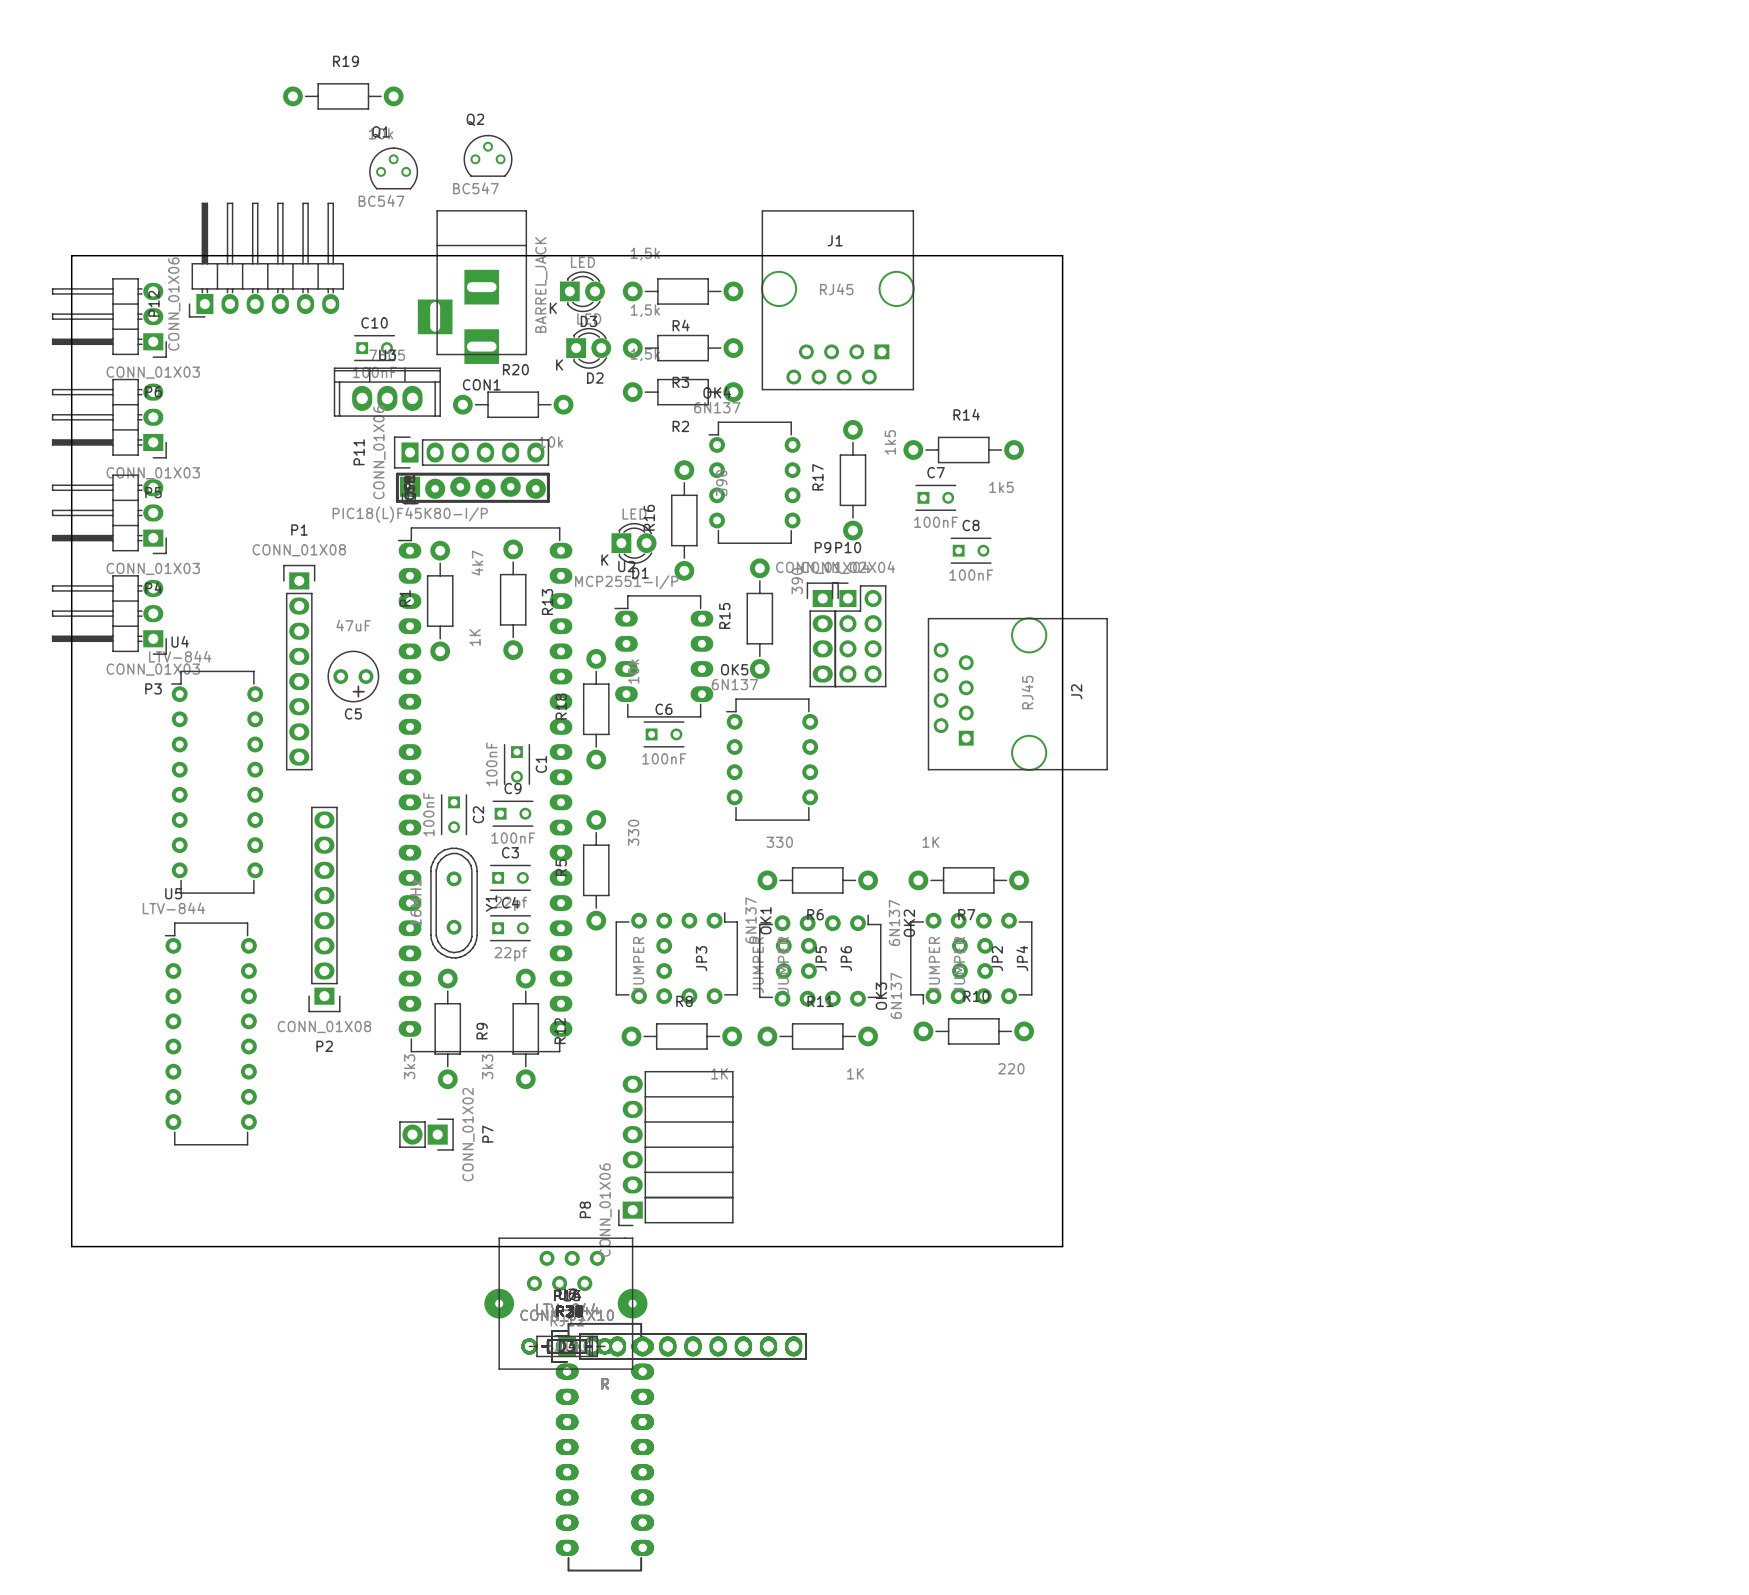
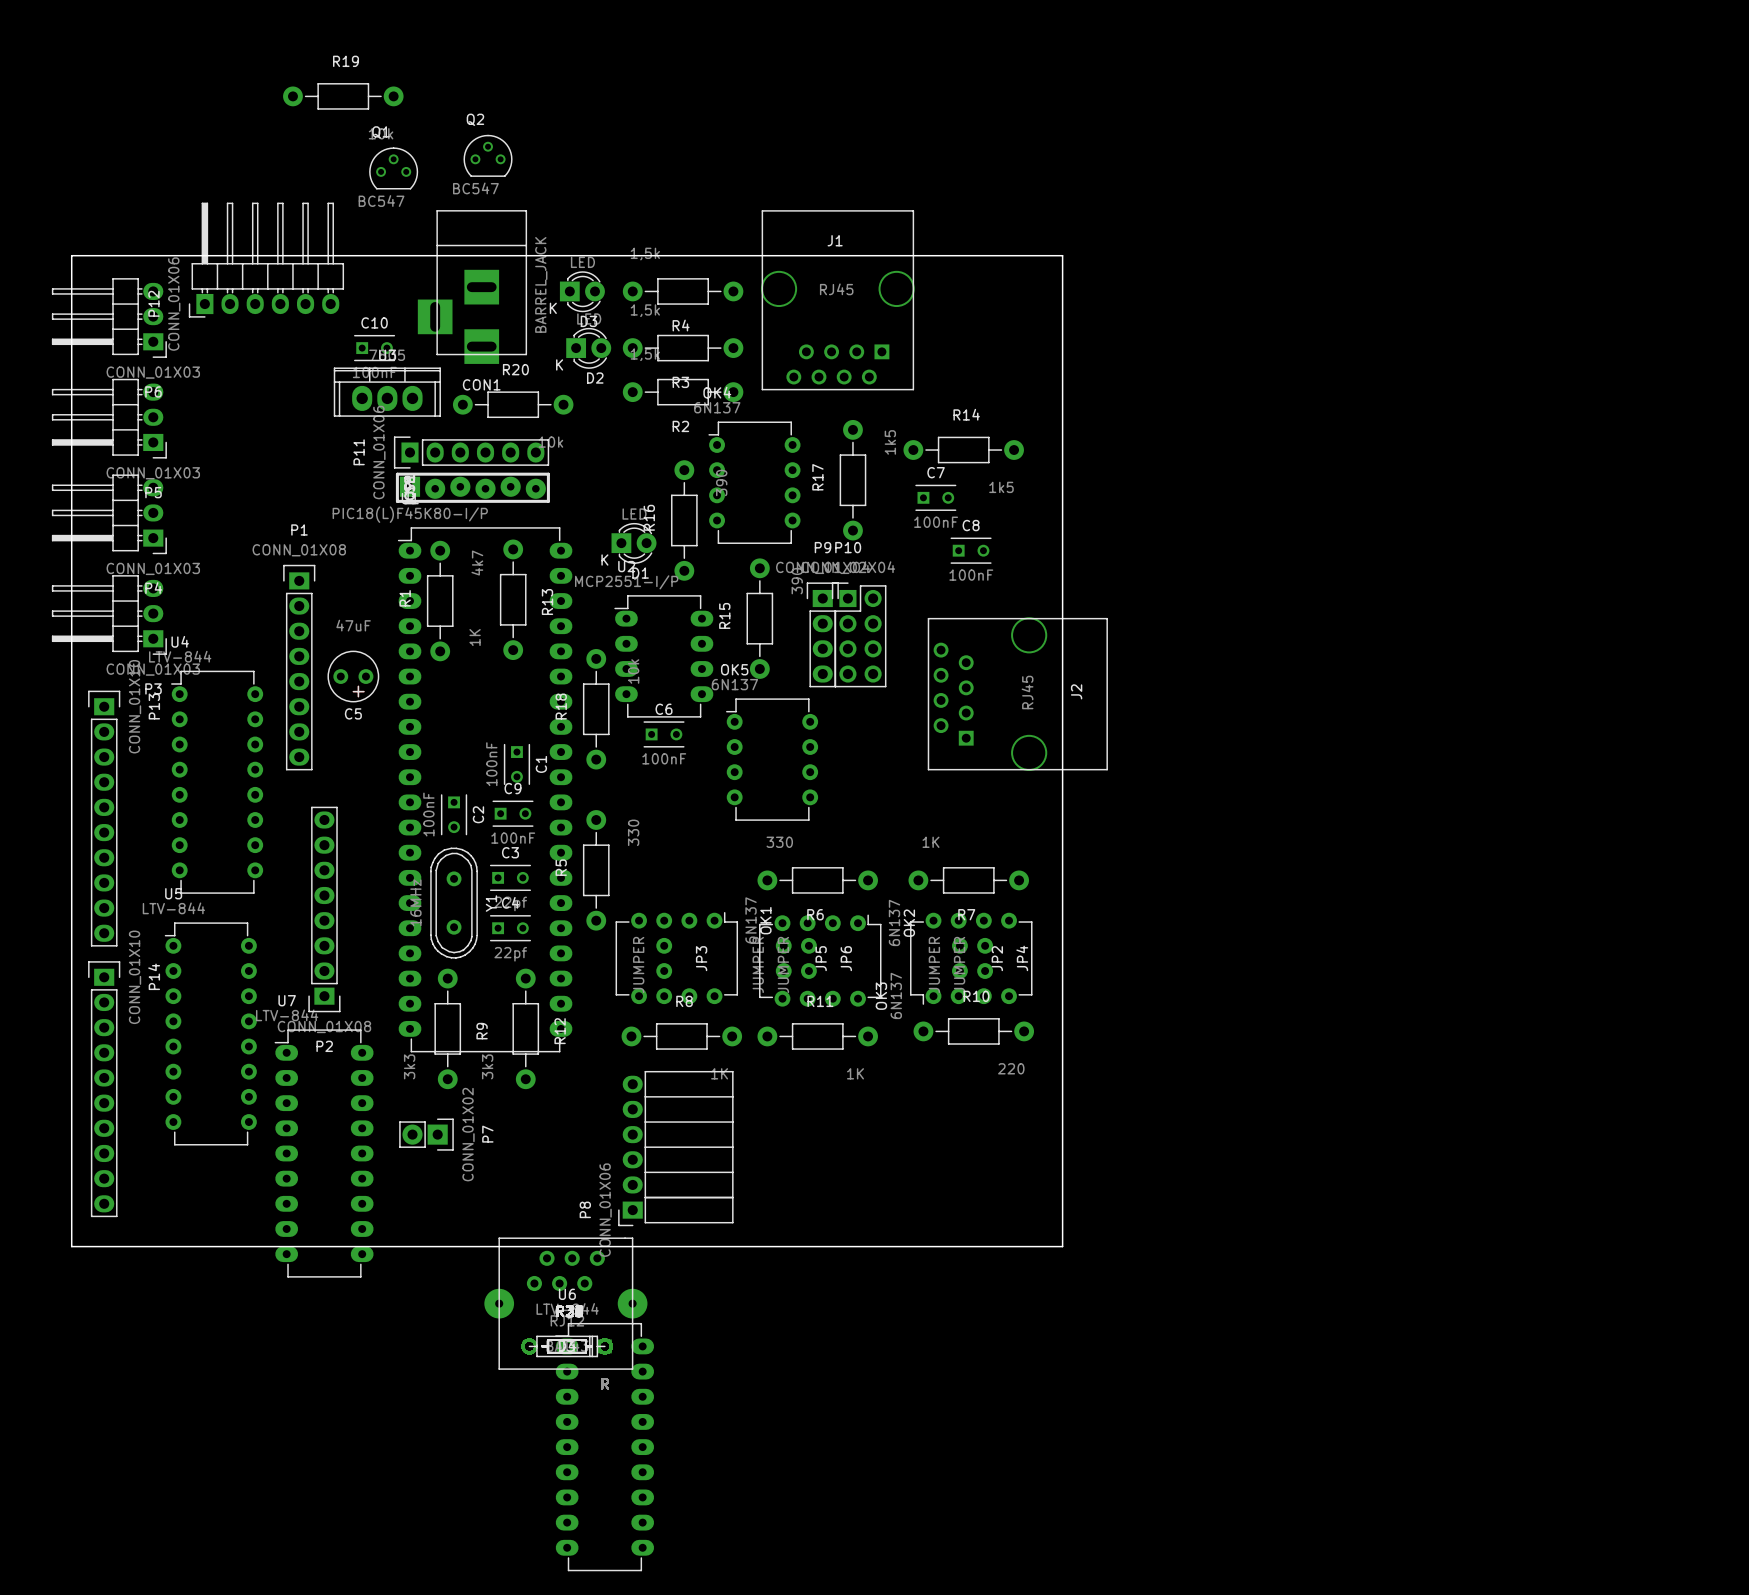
P13 rotation: 0° (679, 1346) -> 90° clockwise (104, 818)
P13 position: (679, 1346) -> (104, 818)
P14 rotation: 0° (679, 1346) -> 90° clockwise (104, 1089)
P14 position: (679, 1346) -> (104, 1089)
U7 position: (604, 1447) -> (324, 1153)

